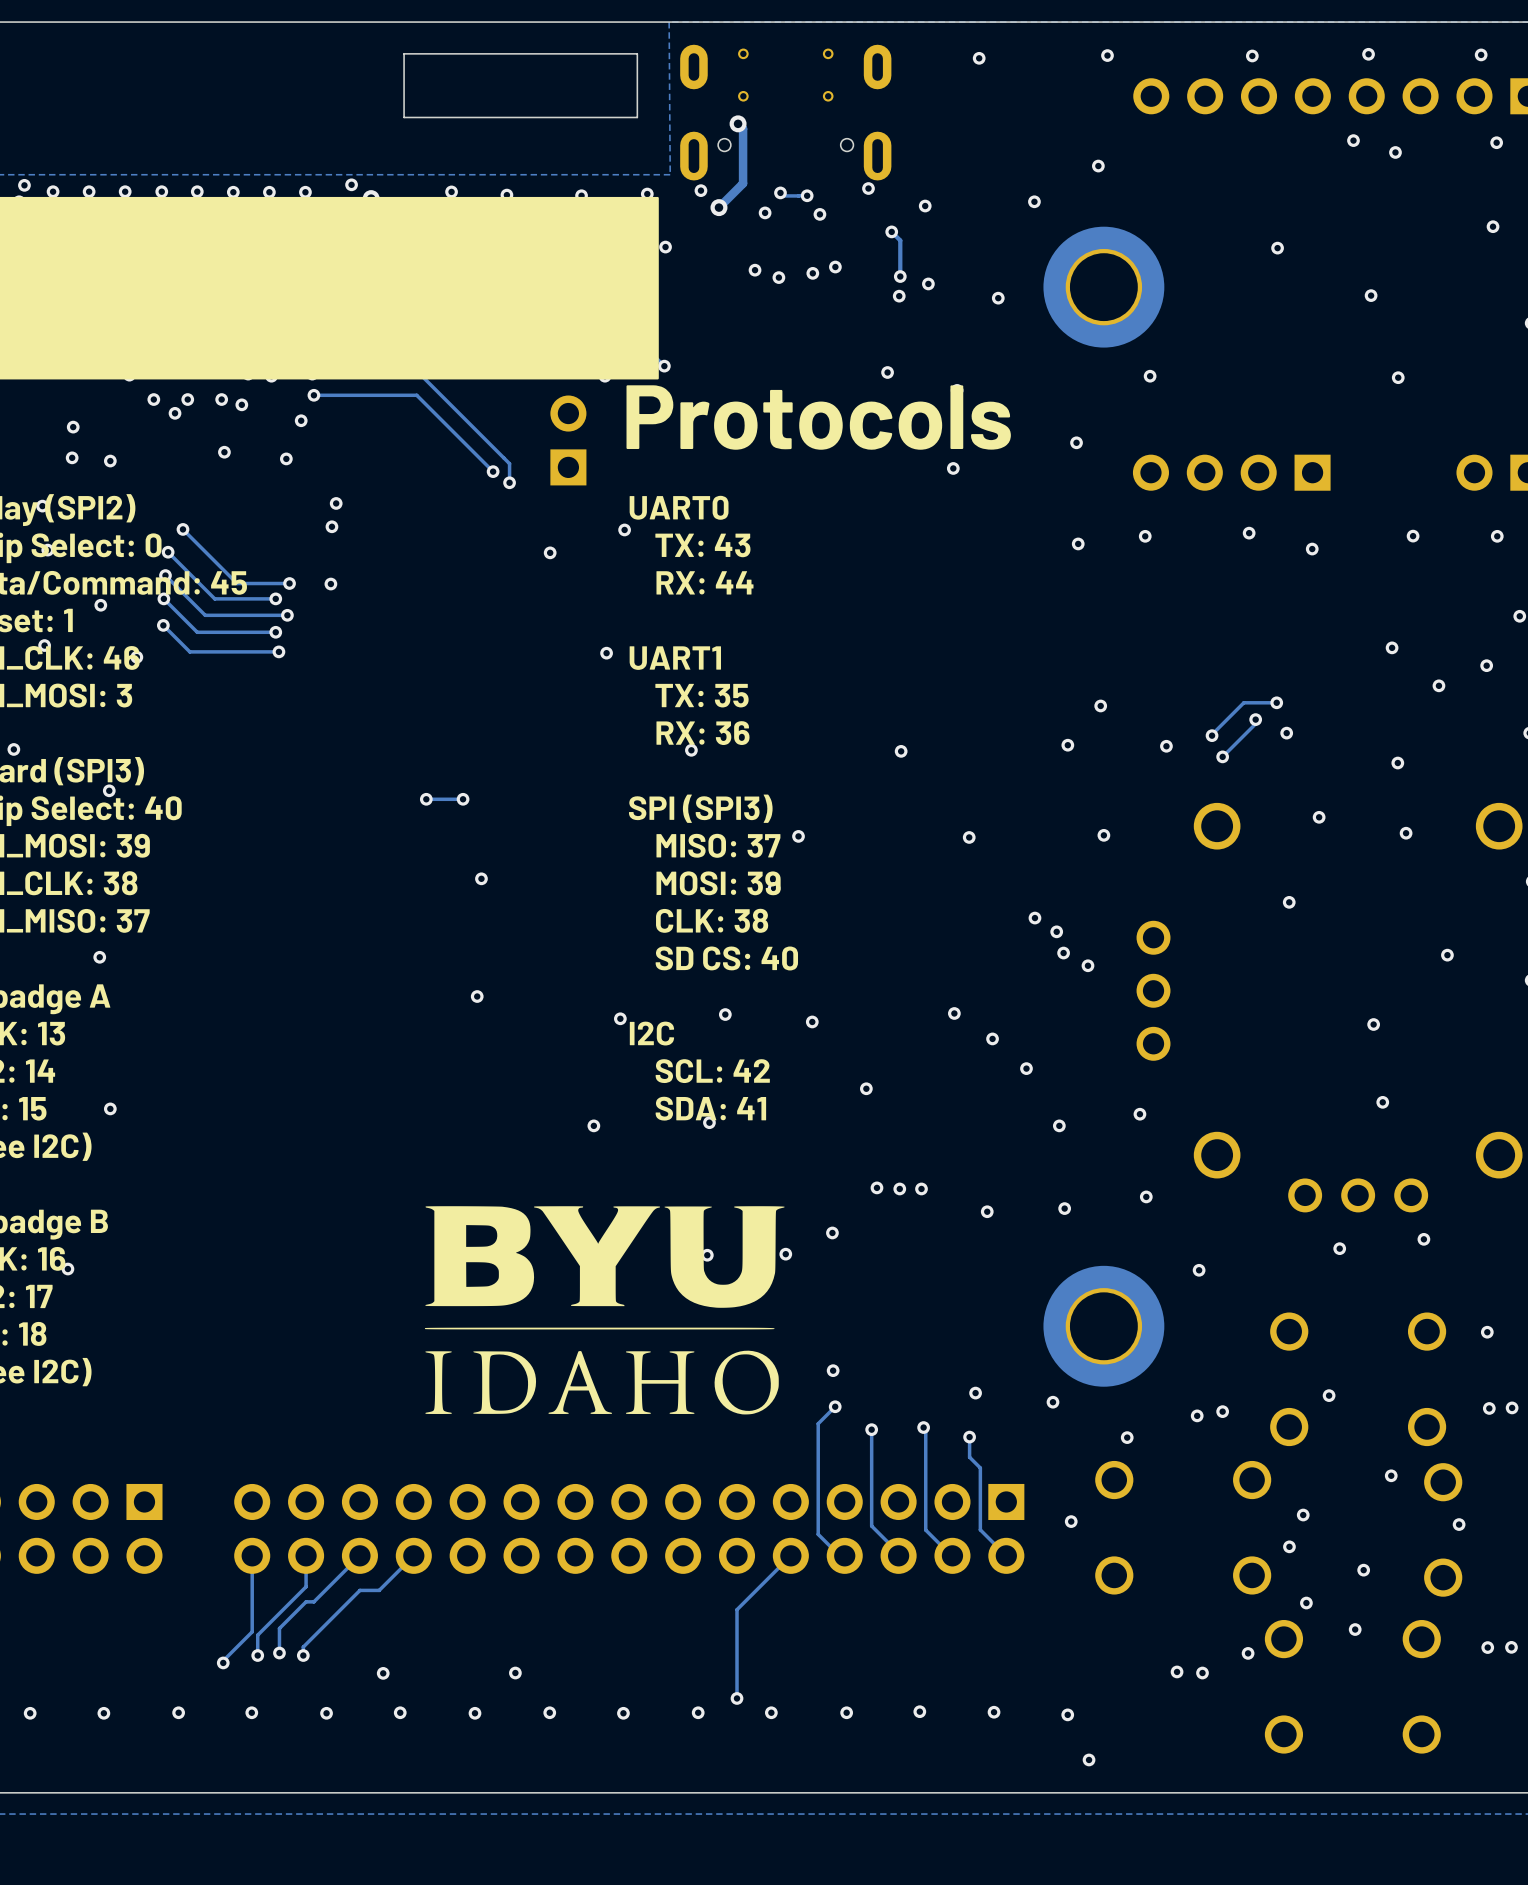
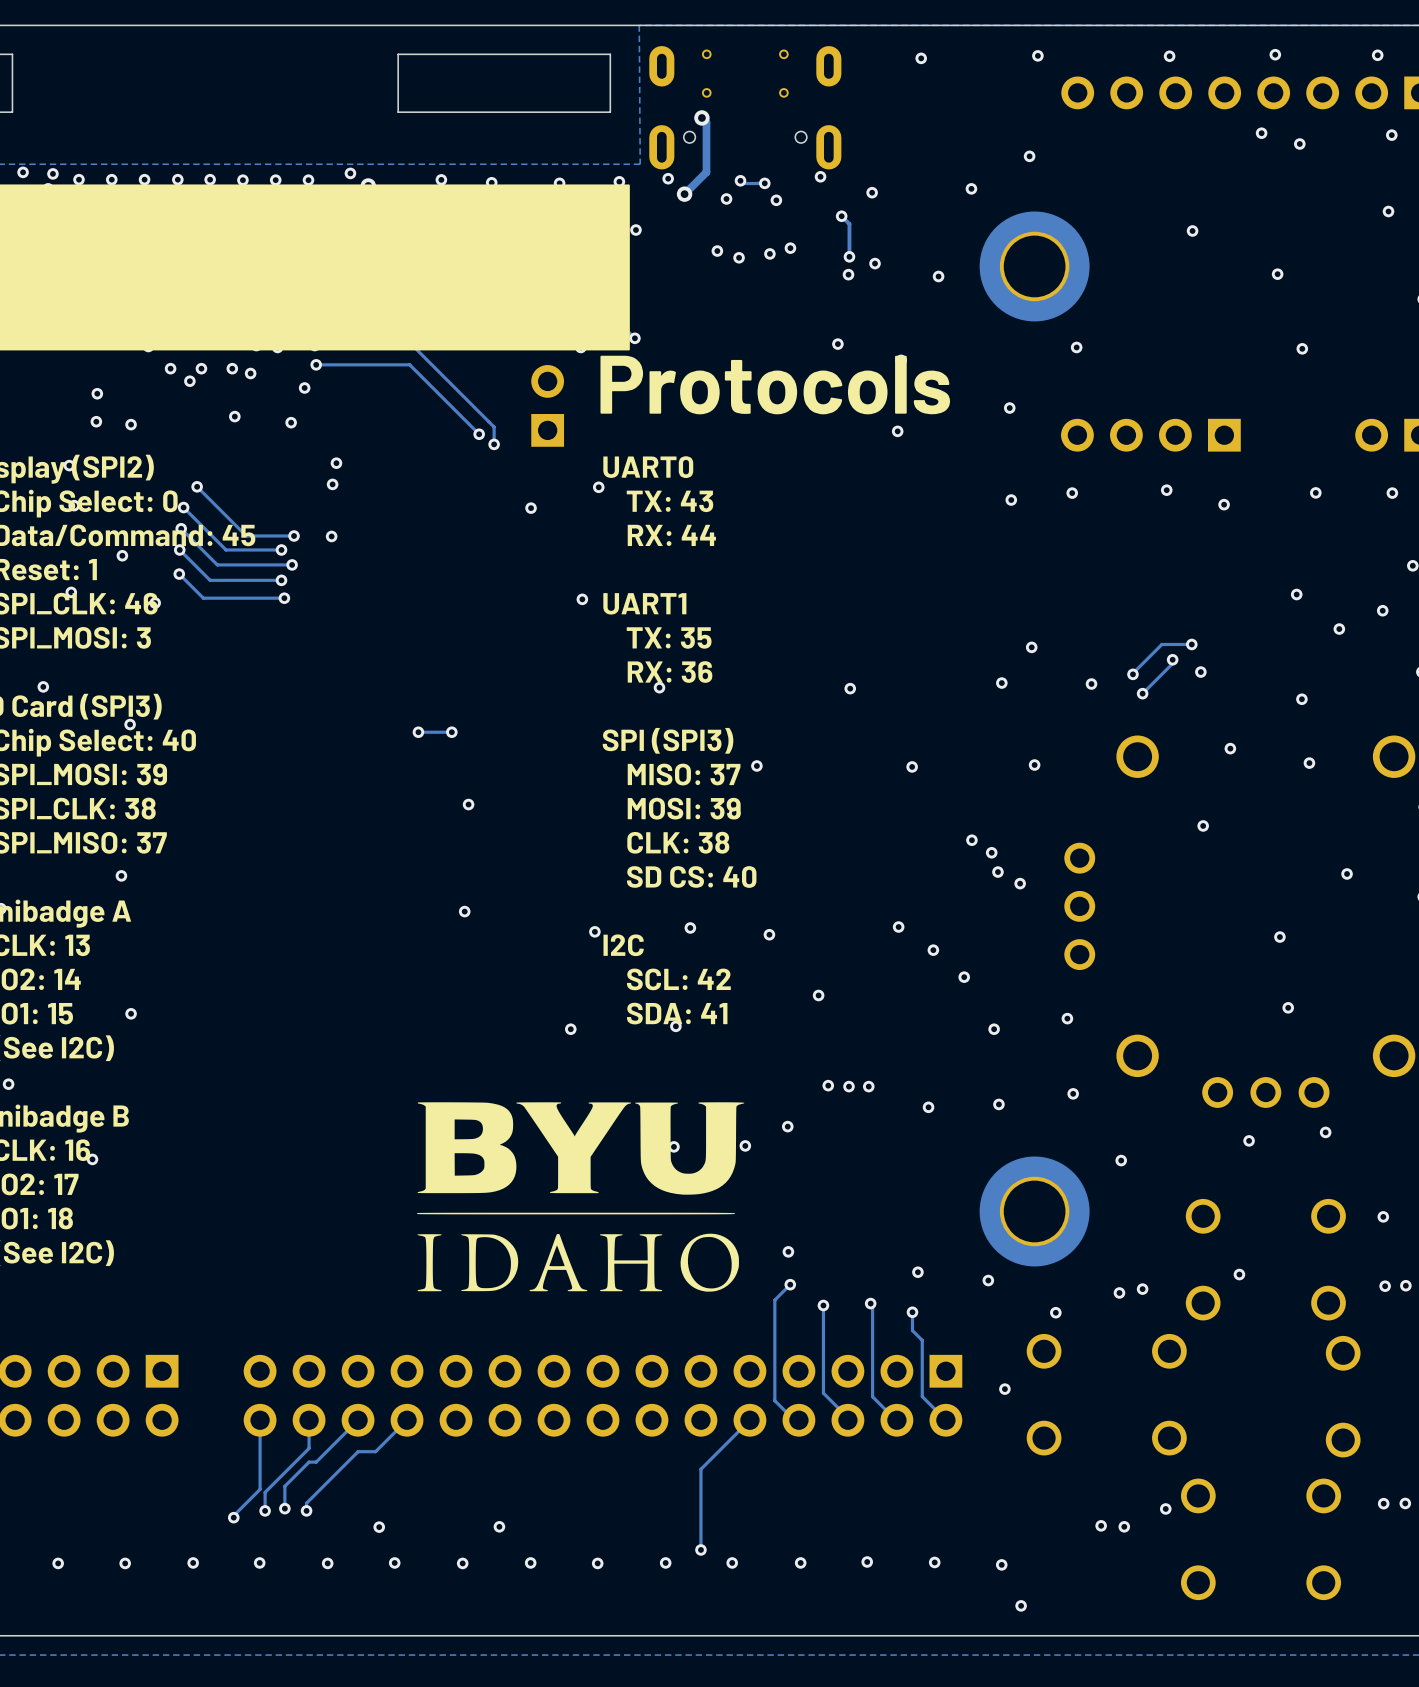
via: (1391, 1475) -> none
via: (1303, 1515) -> none
via: (1459, 1524) -> none
via: (1289, 1546) -> none
via: (1363, 1570) -> none
via: (1306, 1603) -> none
via: (1355, 1629) -> none

